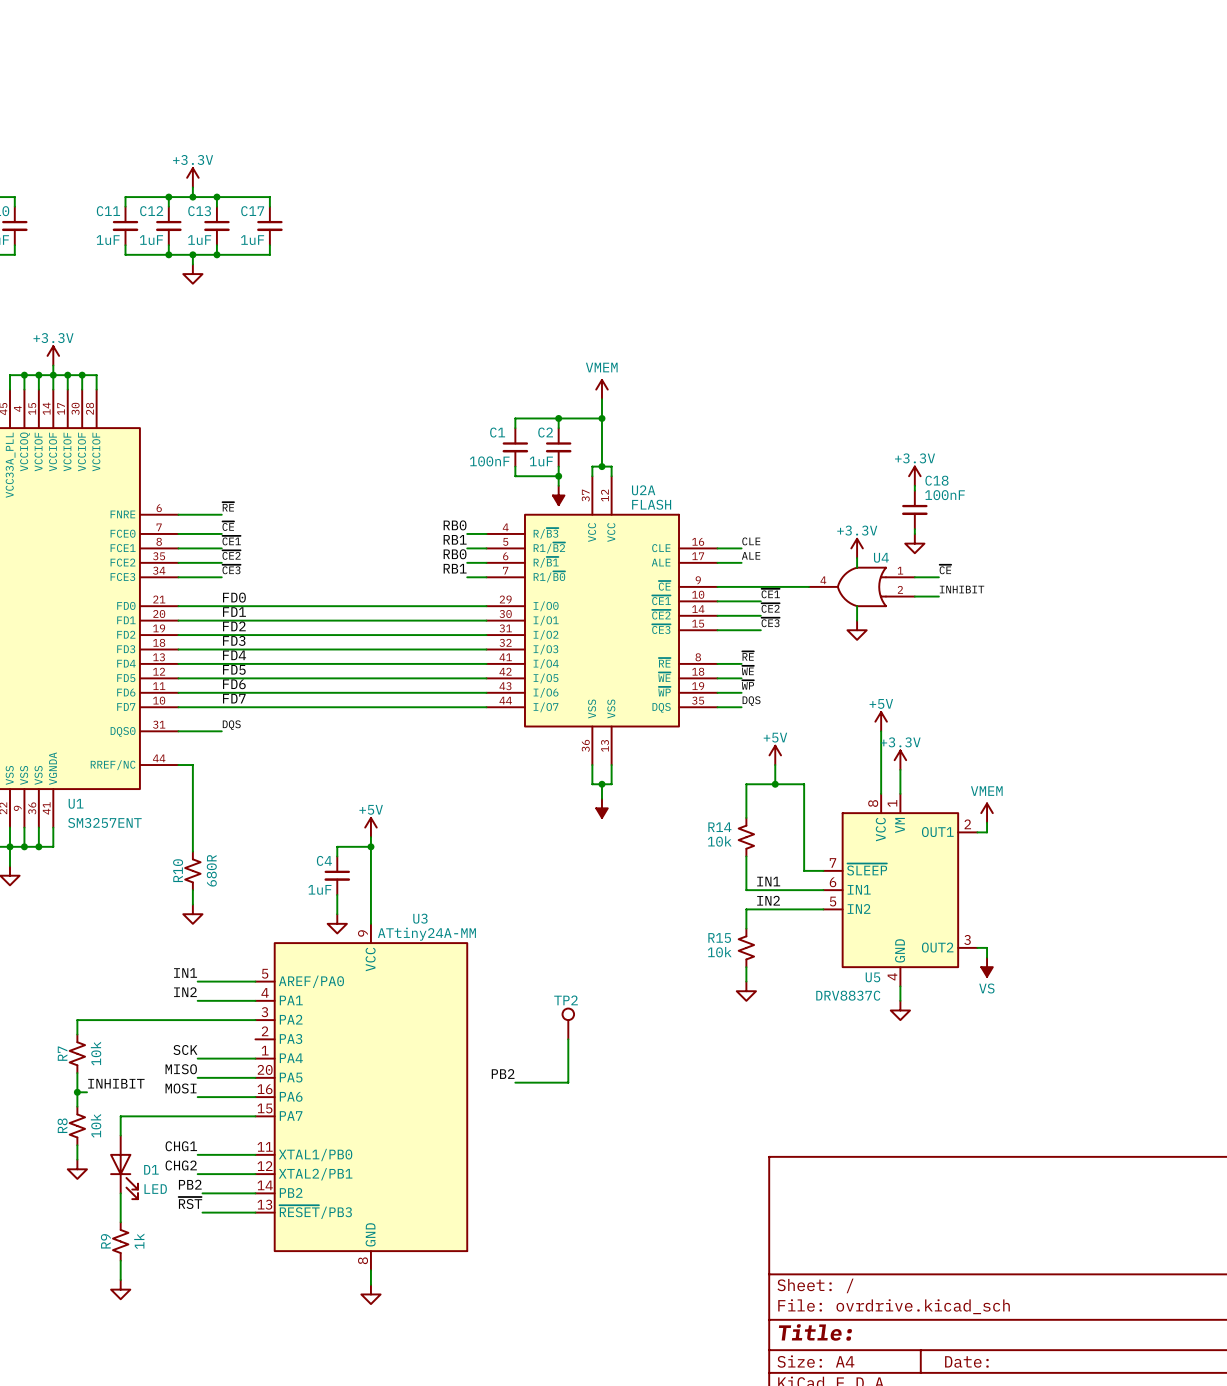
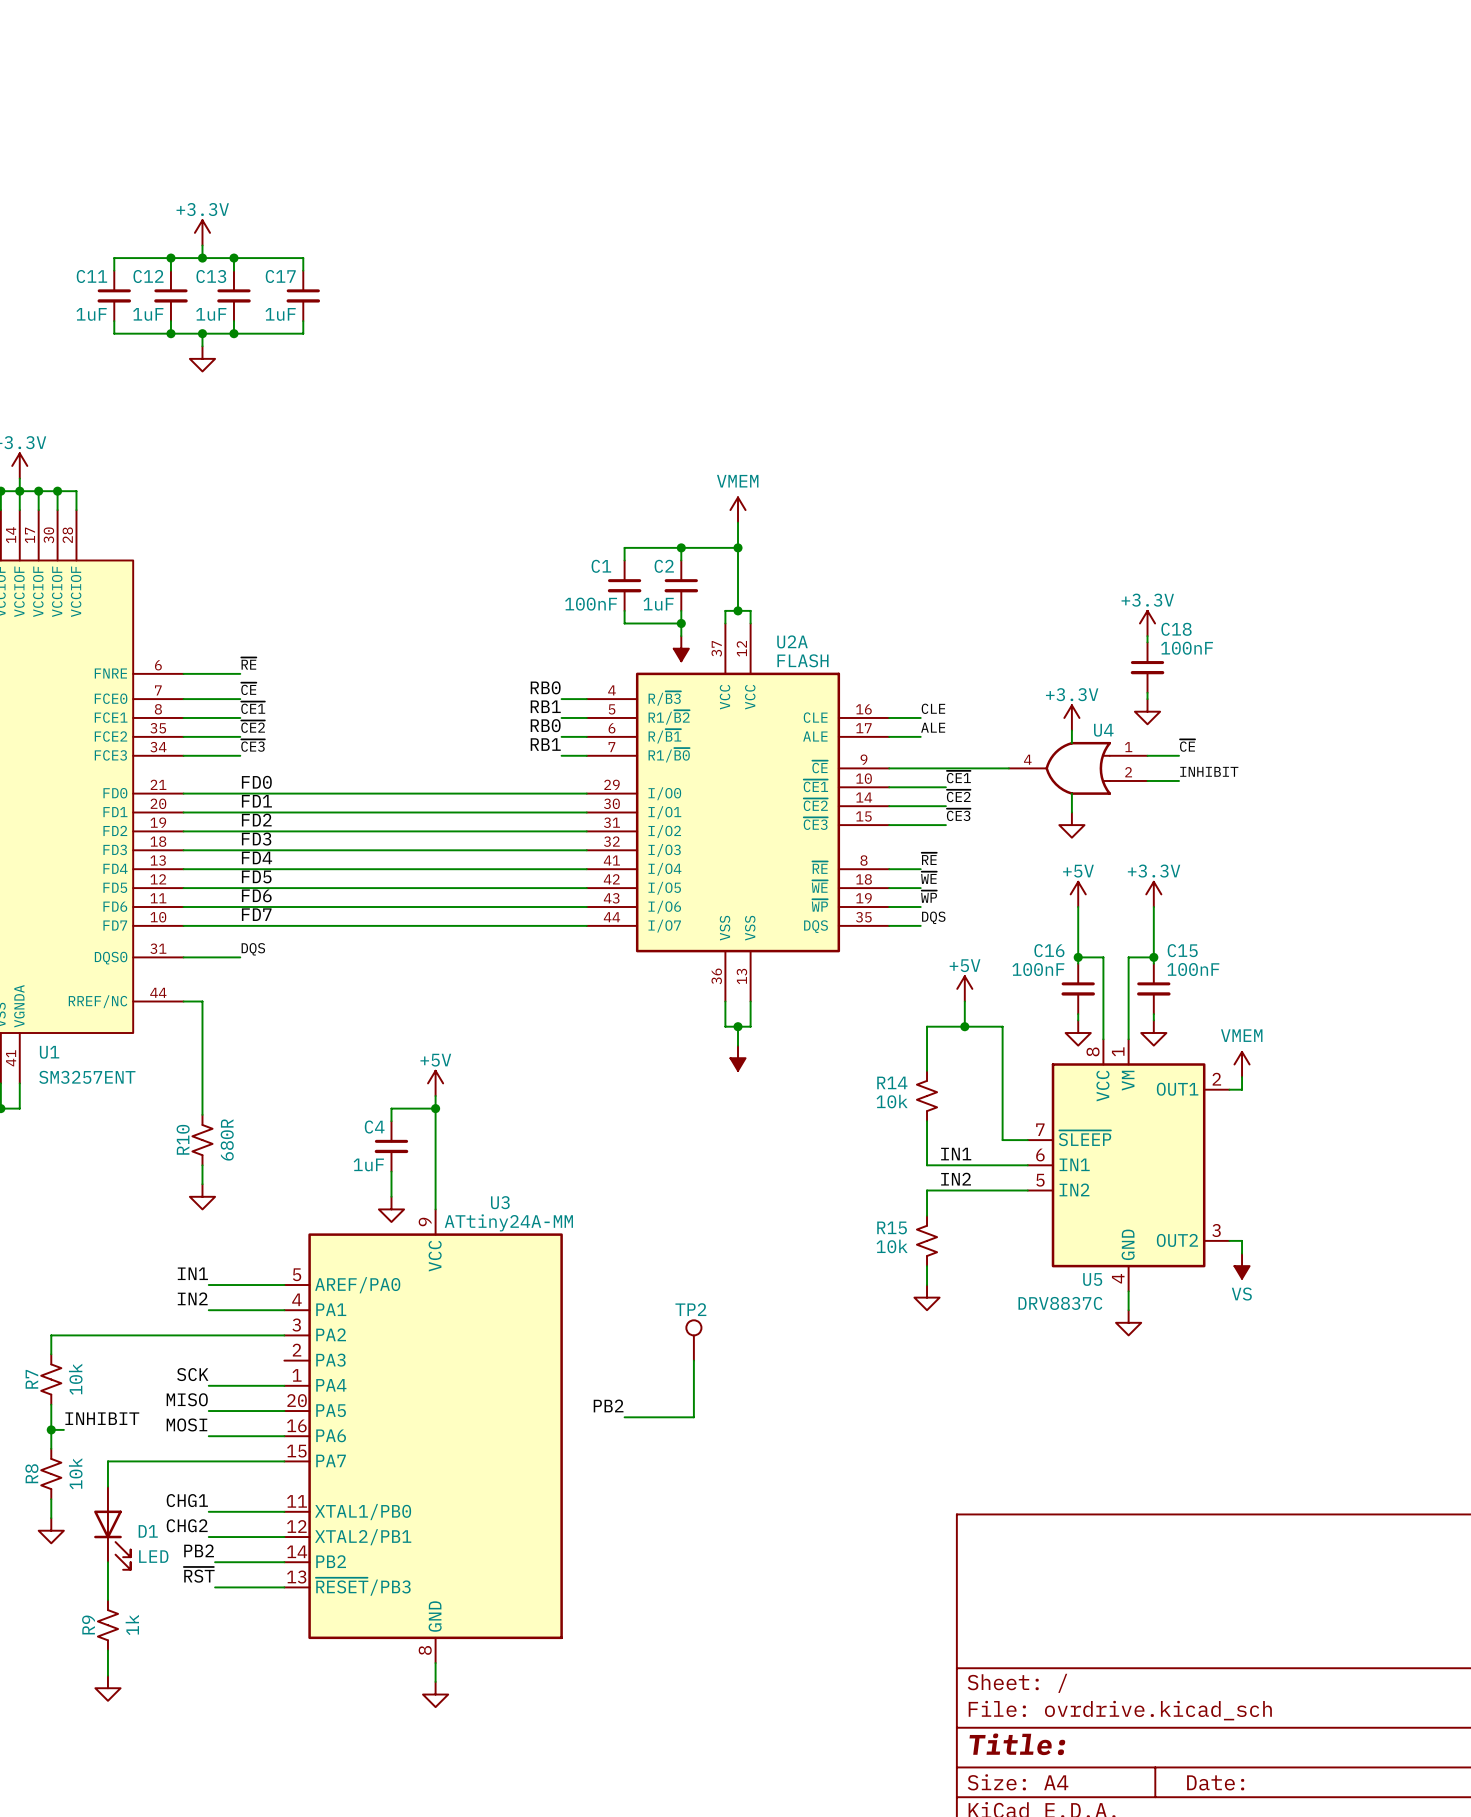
wire: none -> (1078, 906) (1078, 963)
wire: none -> (1153, 906) (1153, 963)
power symbol position: +5V (881, 721) -> +5V (1078, 894)
wire: none -> (1078, 957) (1103, 957)
junction: none -> (1078, 957)
wire: none -> (1153, 957) (1128, 957) (1128, 1007)
junction: none -> (1153, 957)
C16: none -> 100nF (1078, 988)
C15: none -> 100nF (1153, 988)
power symbol position: +3.3V (900, 760) -> +3.3V (1153, 894)
wire: none -> (1078, 1014) (1078, 1020)
wire: none -> (1153, 1014) (1153, 1020)
power symbol: none -> (1078, 1033)
power symbol: none -> (1153, 1033)

